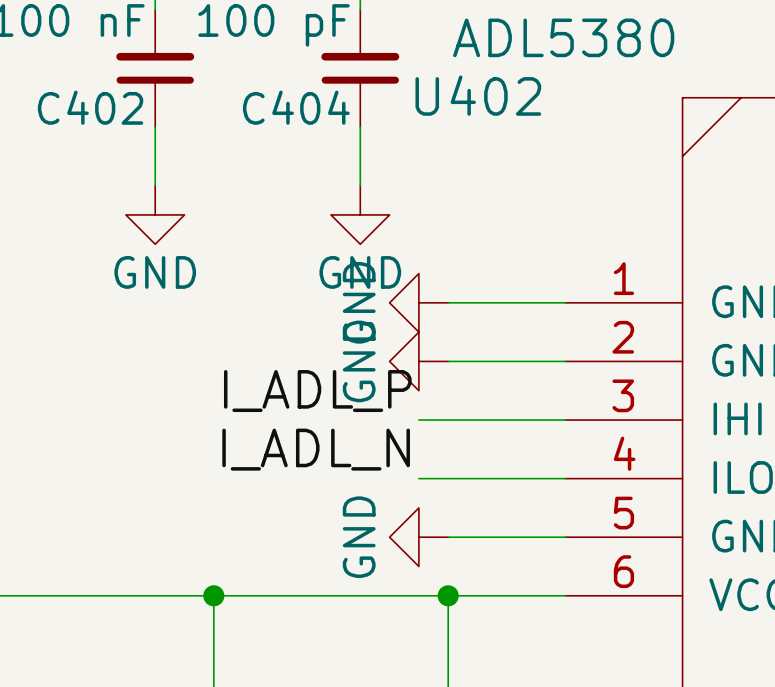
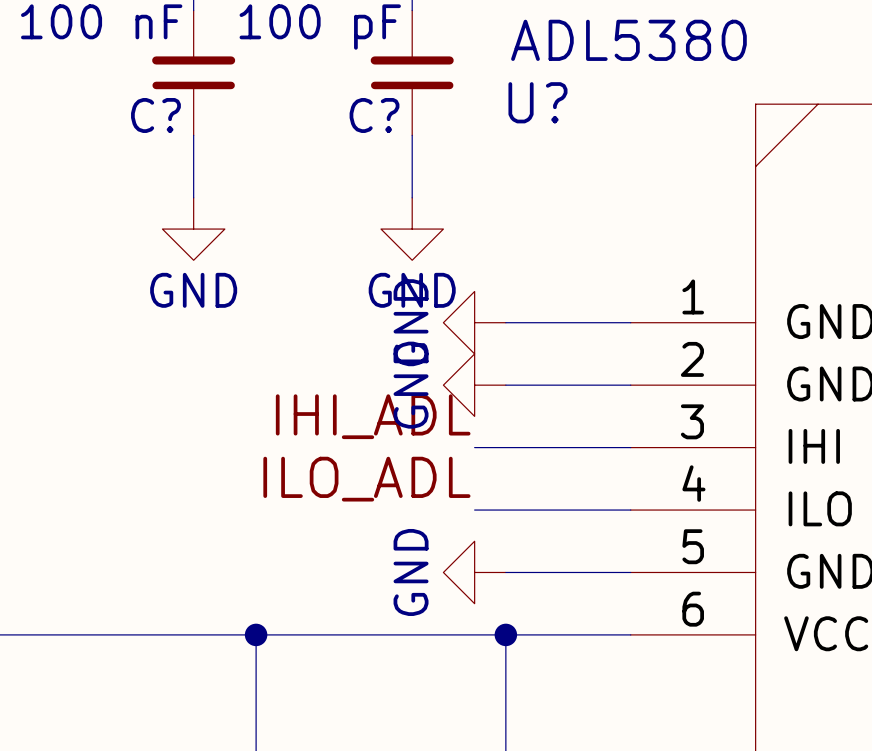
U402 name: U402 (478, 95) -> U? (537, 102)
C402 name: C402 (90, 107) -> C? (155, 115)
C404 name: C404 (296, 107) -> C? (374, 115)
label: I_ADL_P (317, 391) -> IHI_ADL (373, 416)
label: I_ADL_N (316, 449) -> ILO_ADL (366, 479)

